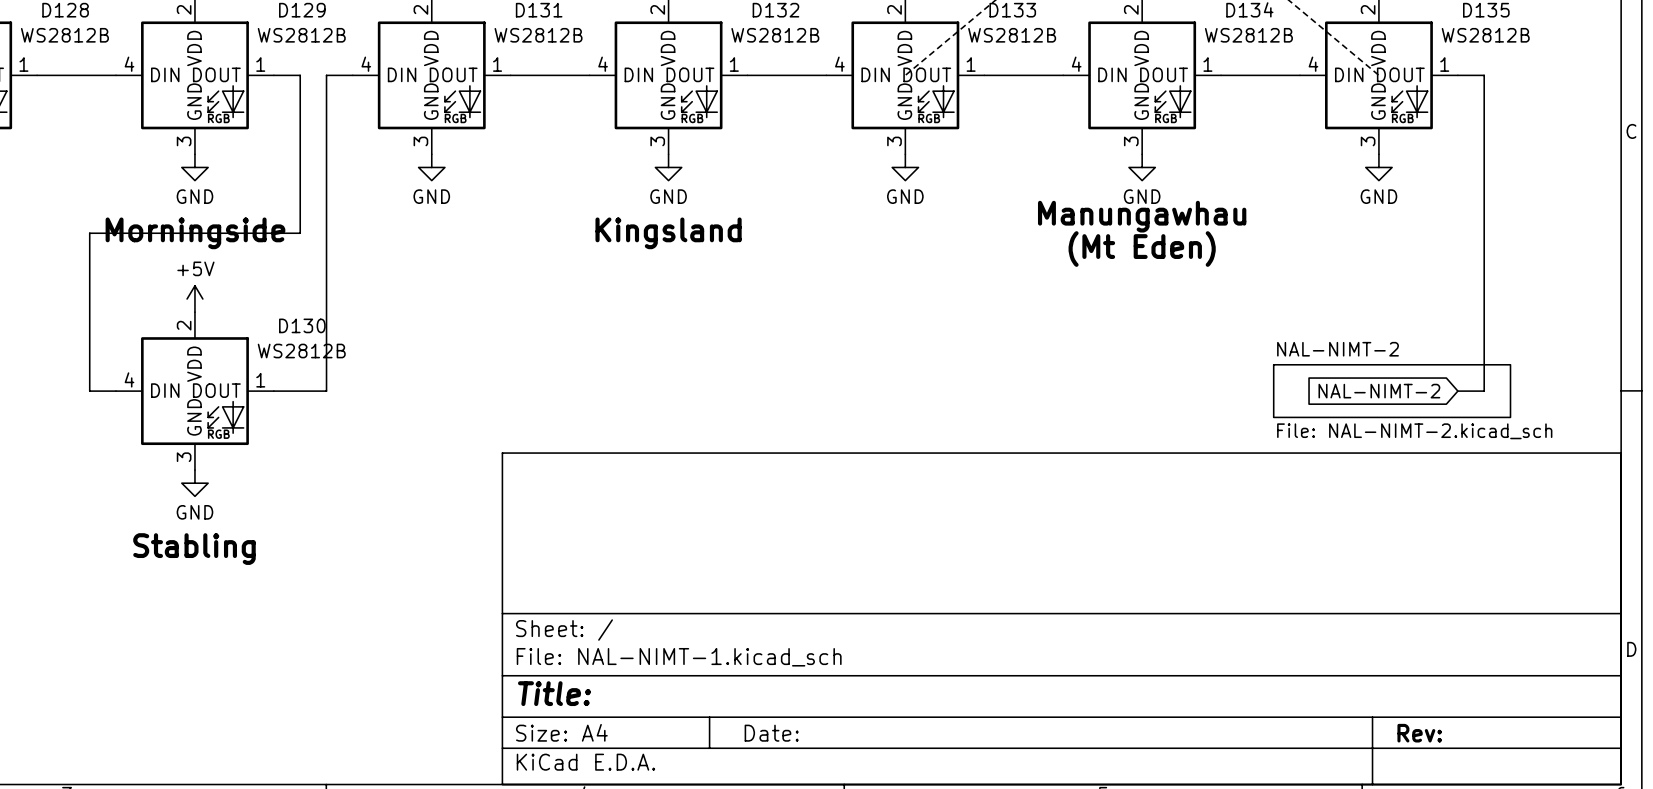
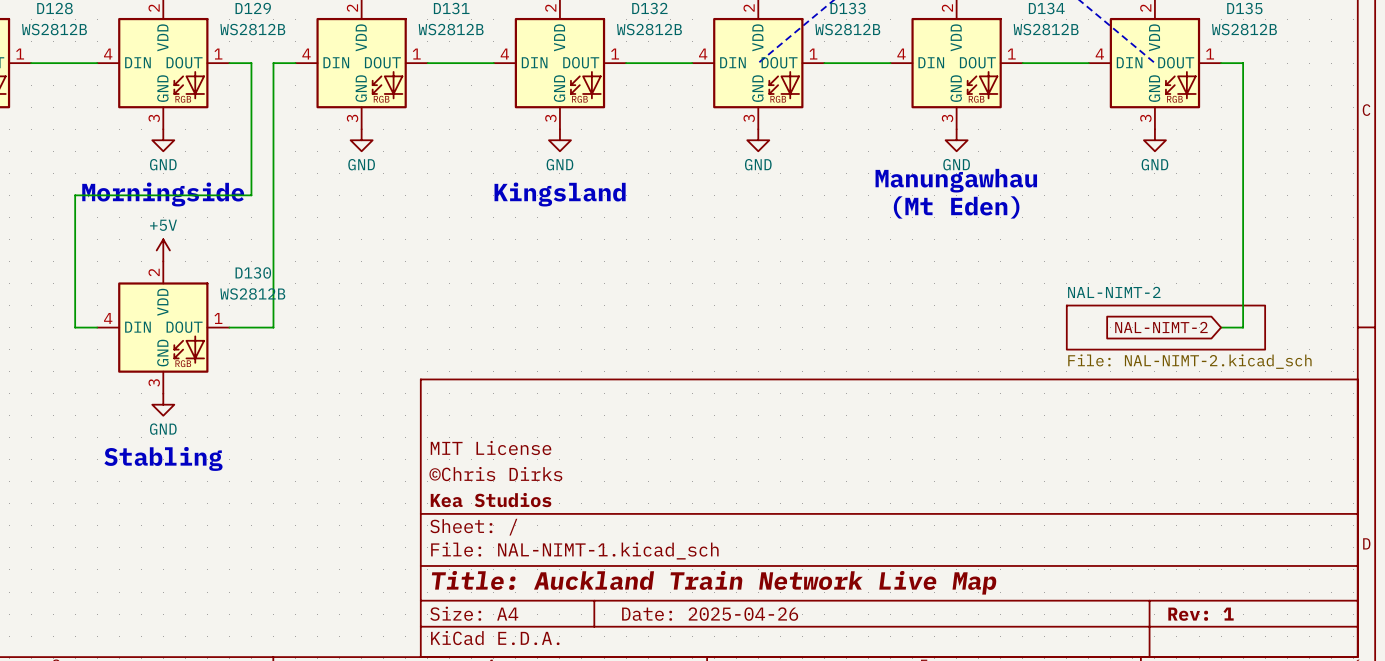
title block: none -> MIT License (491, 448)
title block: none -> ©Chris Dirks (495, 474)
title block: none -> Kea Studios (491, 500)
title block: Title: (554, 693) -> Title: Auckland Train Network Live Map (714, 582)
title block: Date: (771, 733) -> Date: 2025-04-26 (710, 614)
title block: Rev: (1419, 733) -> Rev: 1 (1201, 614)

